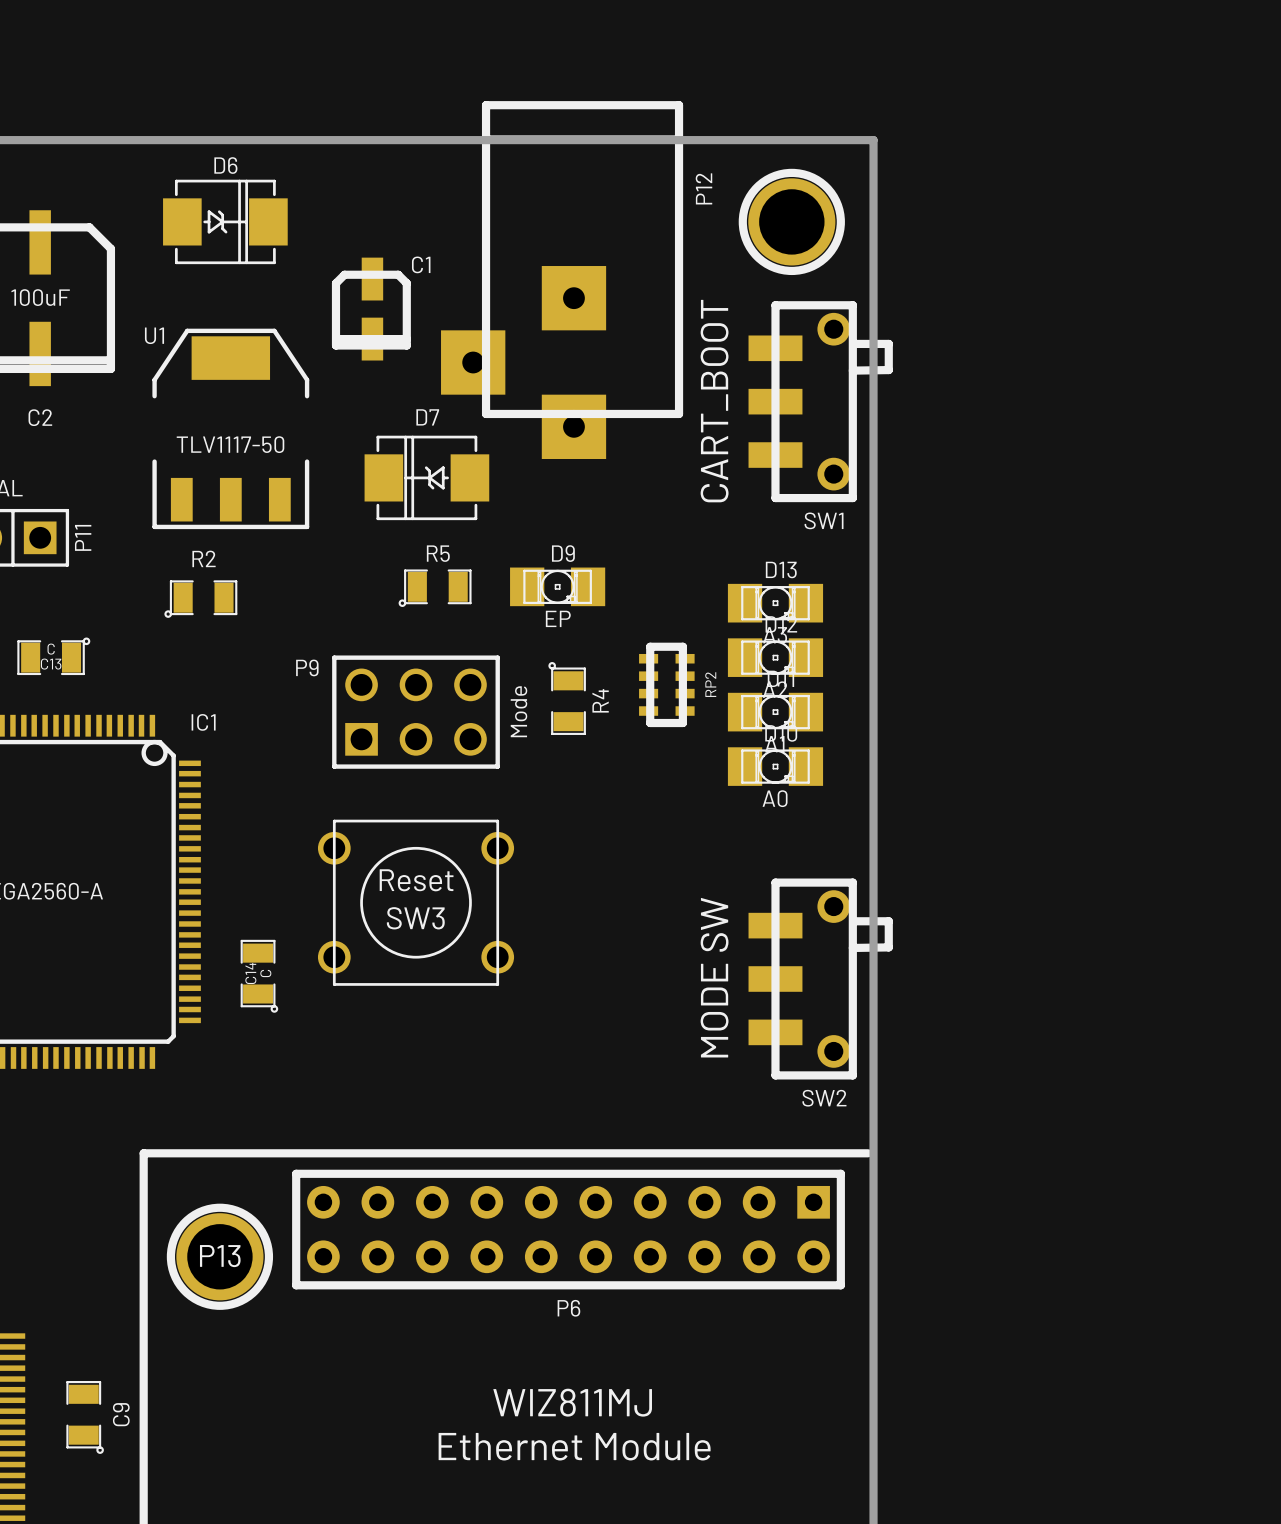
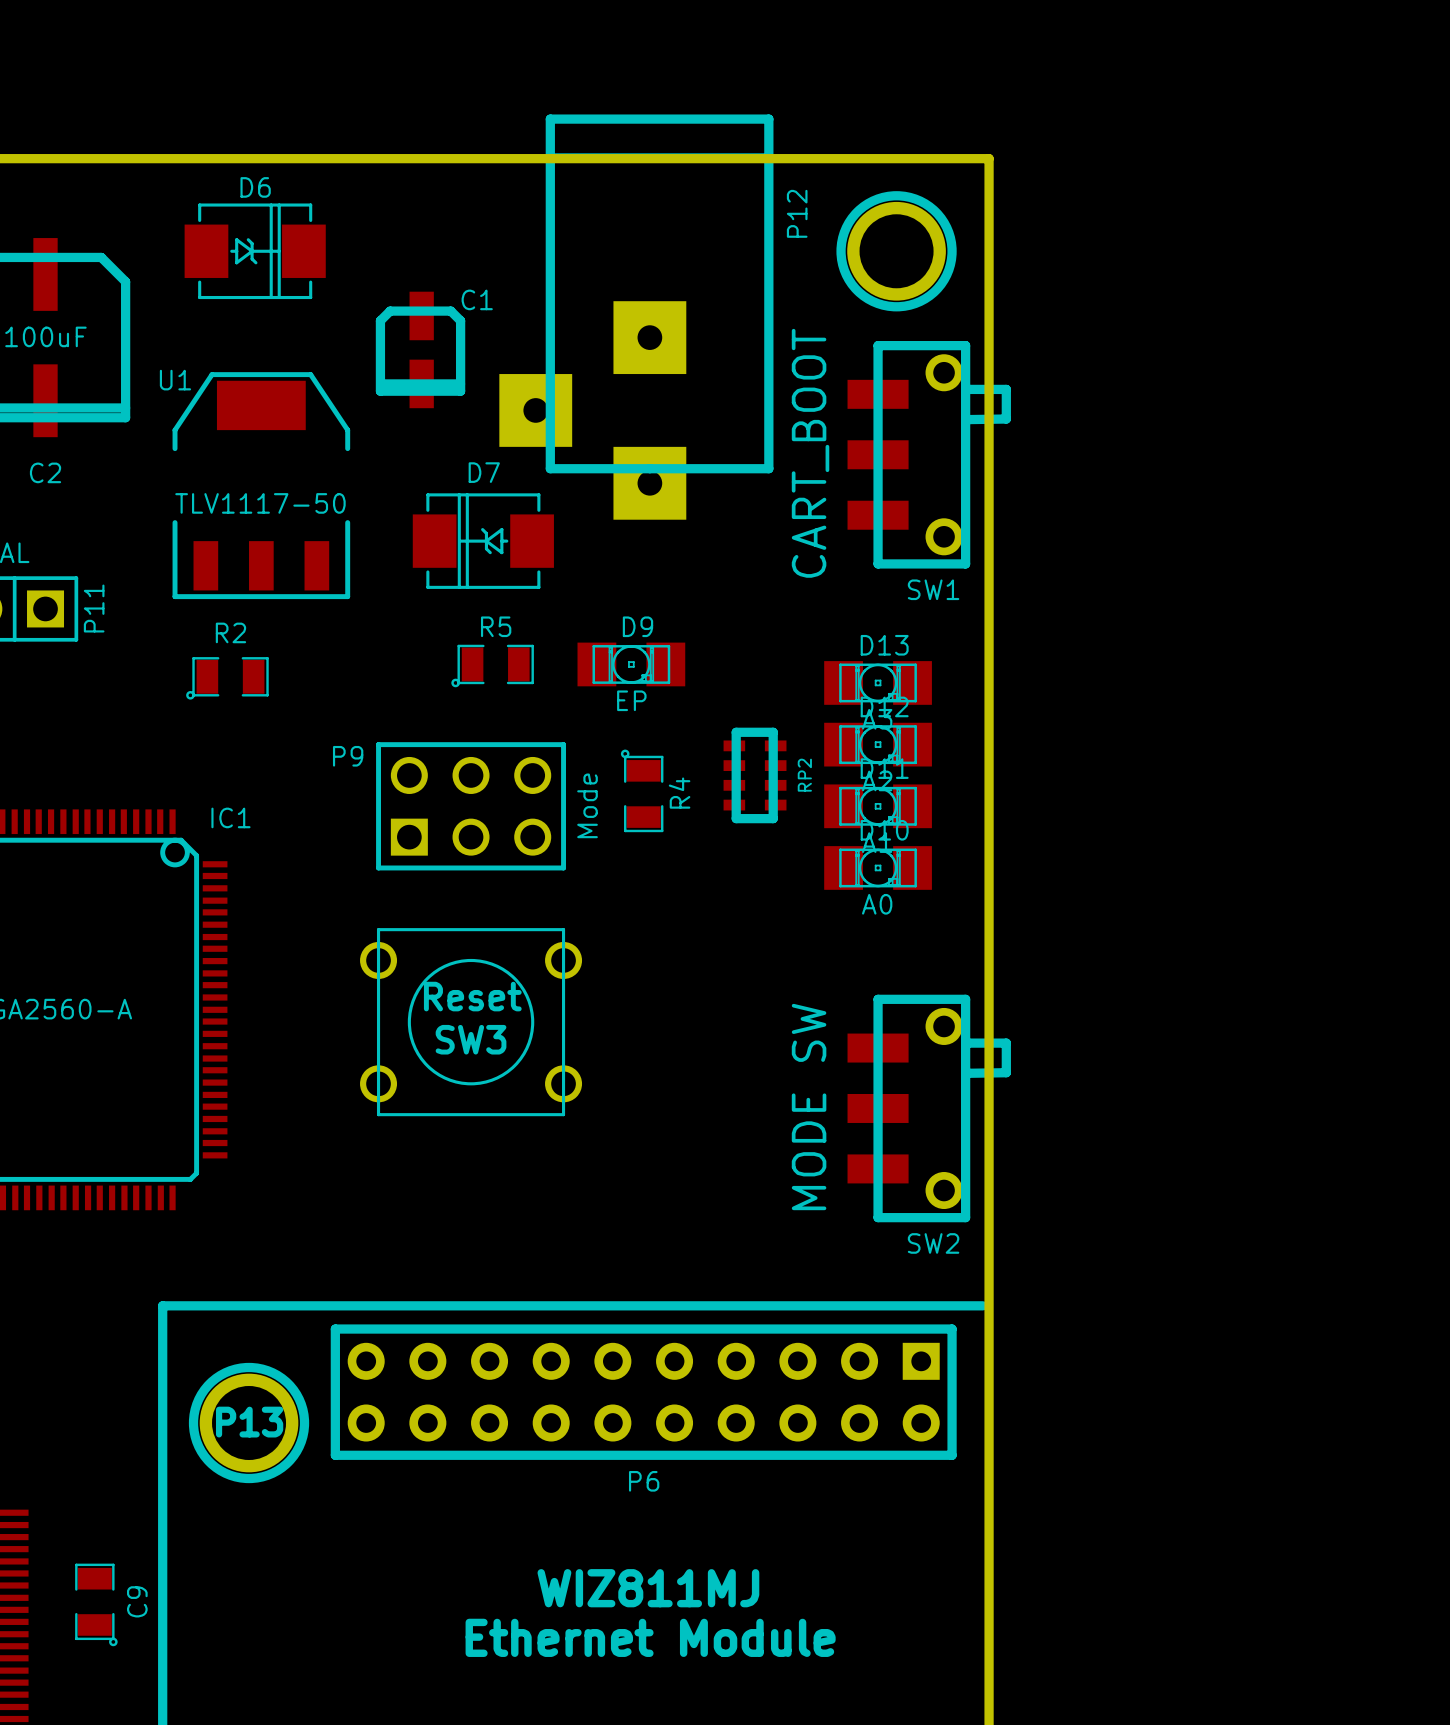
C13: C (53, 656) -> none
C14: C (259, 976) -> none

